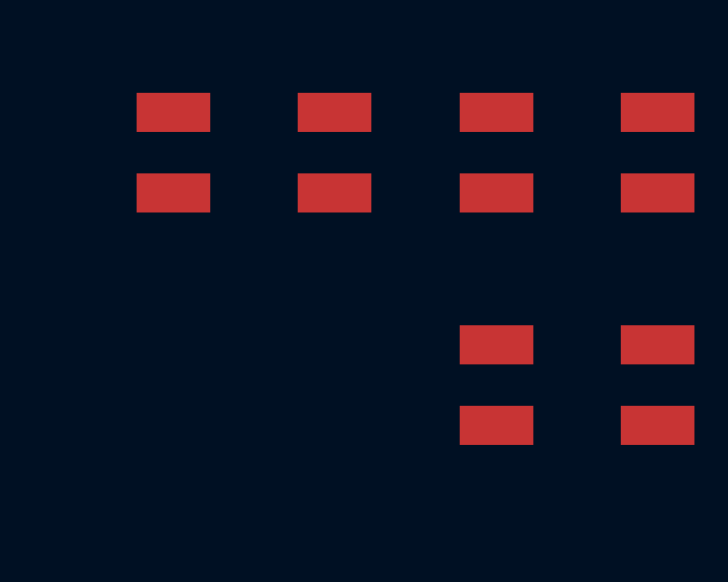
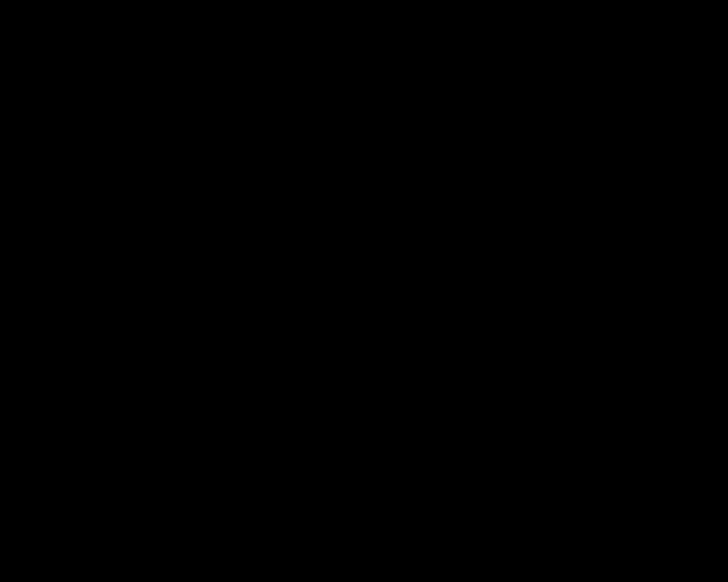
part: (253, 152) -> none
part: (577, 152) -> none
part: (577, 385) -> none

